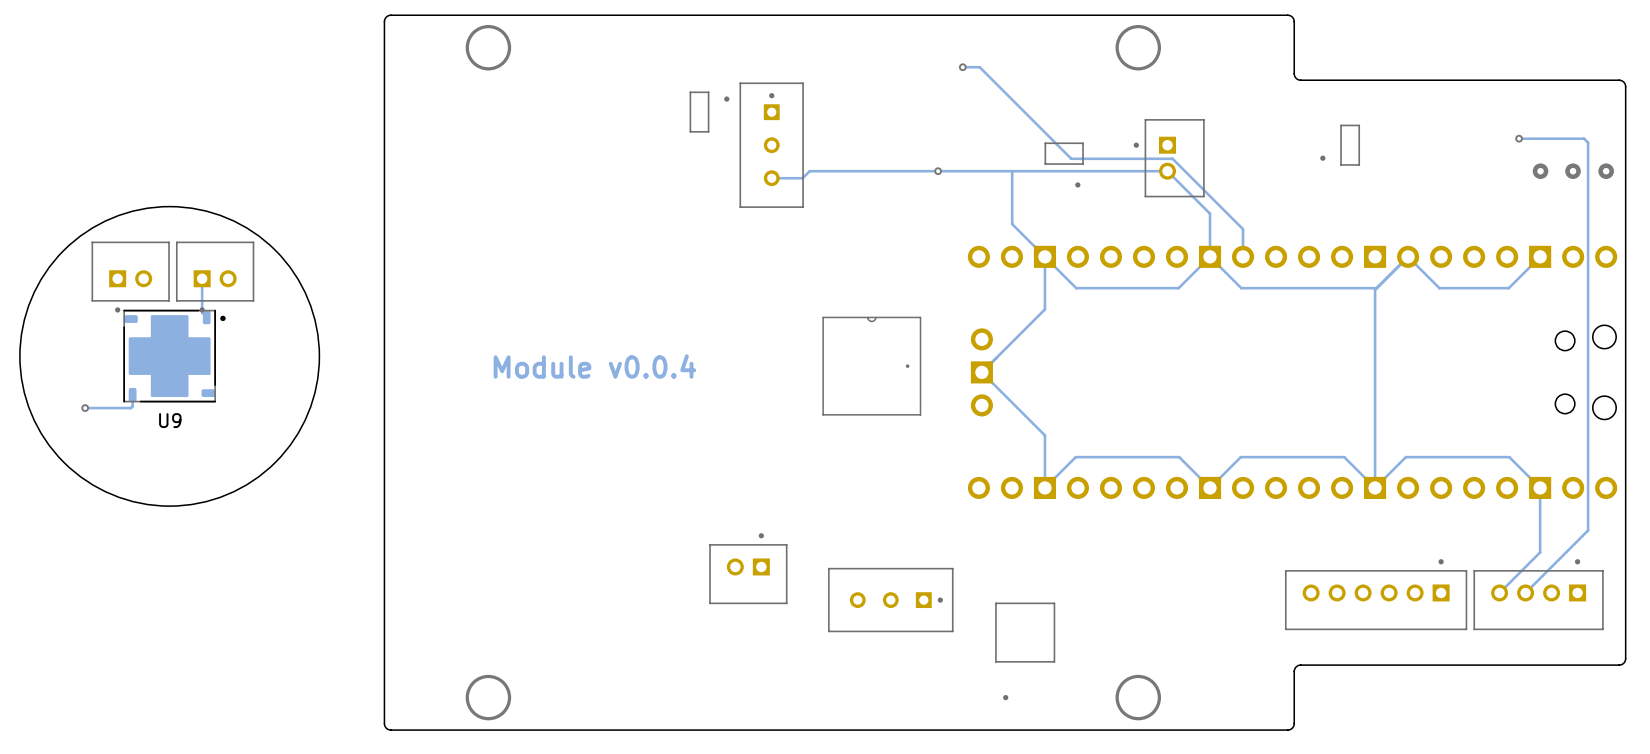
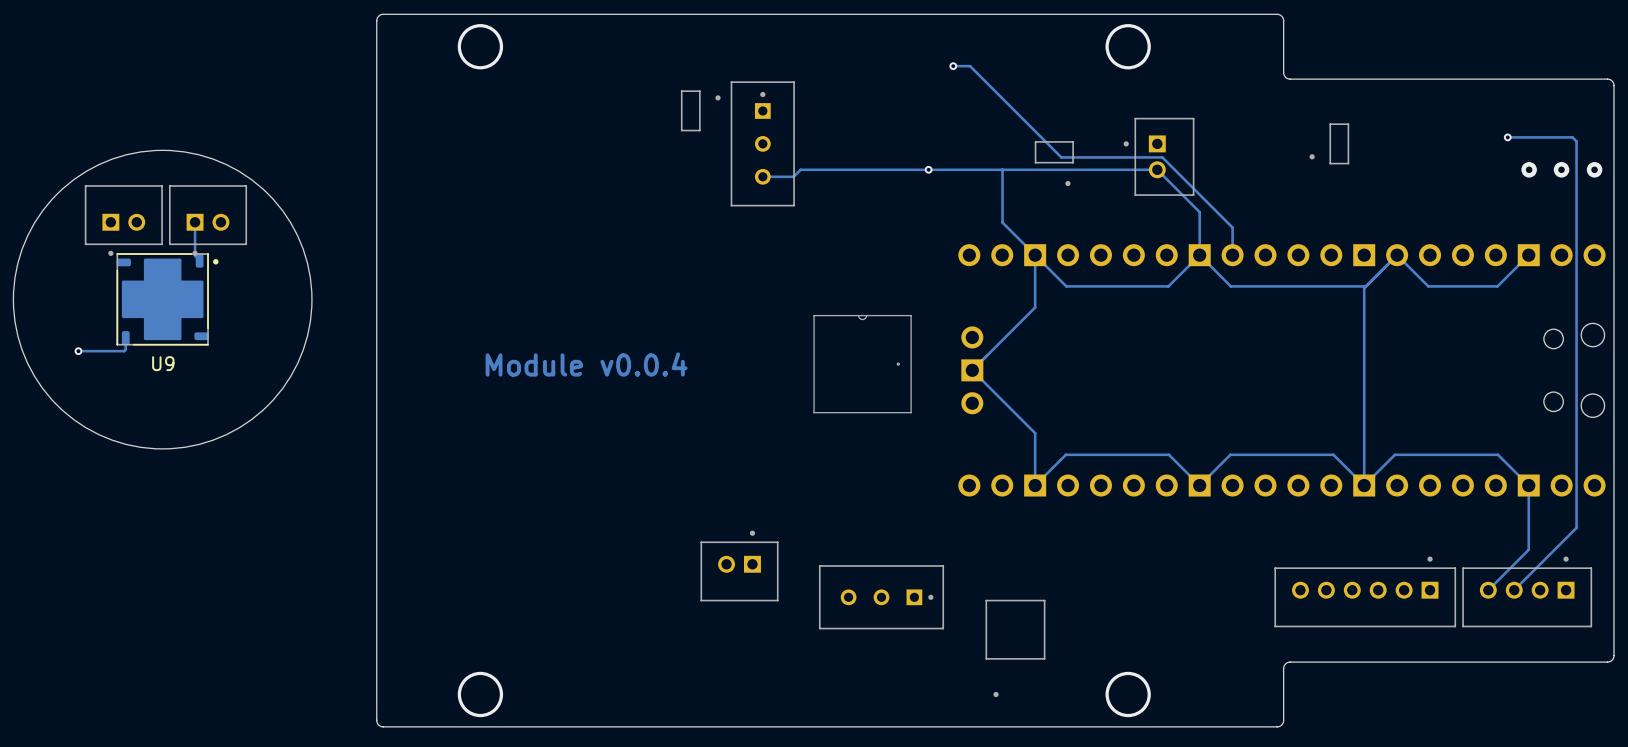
part: none -> (123, 220)
part: none -> (208, 220)
part: (130, 277) -> none
part: (215, 277) -> none
track: (202, 278) (202, 312) (206, 317) -> (195, 222) (195, 255) (199, 260)
round board edge position: (169, 356) -> (162, 299)
U9 position: (174, 356) -> (167, 299)
track: (132, 395) (130, 408) (85, 408) -> (125, 338) (124, 351) (78, 351)
via position: (85, 408) -> (78, 351)

